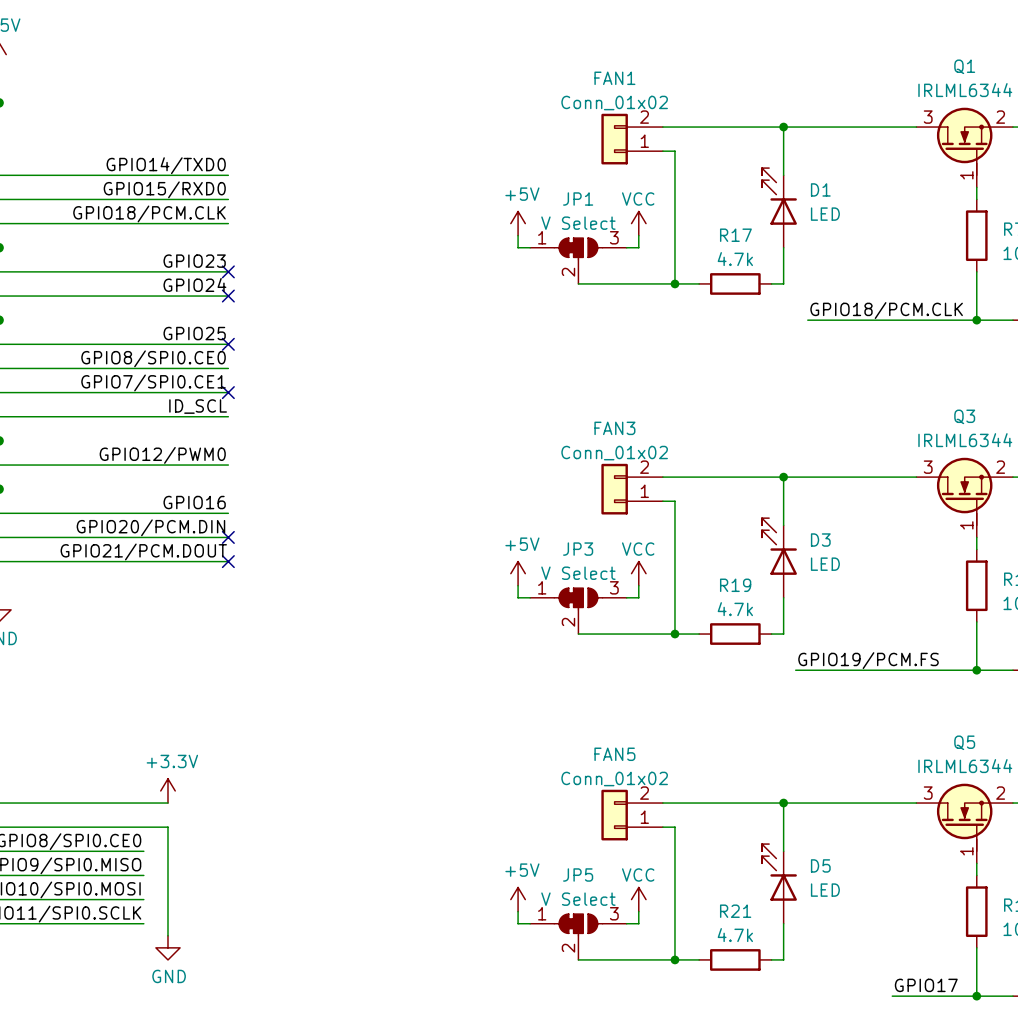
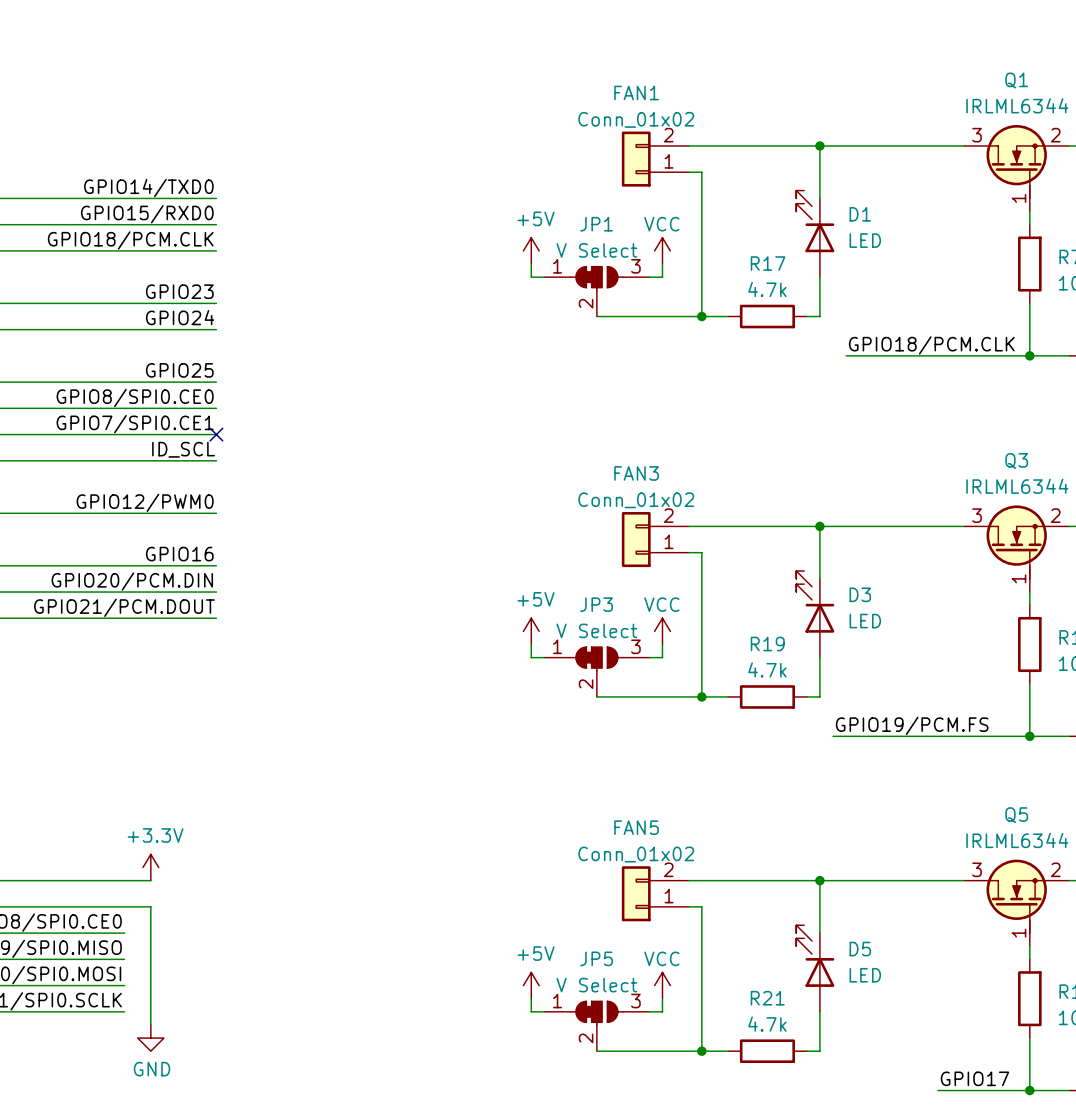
no-connect mark: (228, 271) -> none
no-connect mark: (228, 296) -> none
no-connect mark: (228, 344) -> none
no-connect mark: (228, 537) -> none
no-connect mark: (228, 561) -> none

